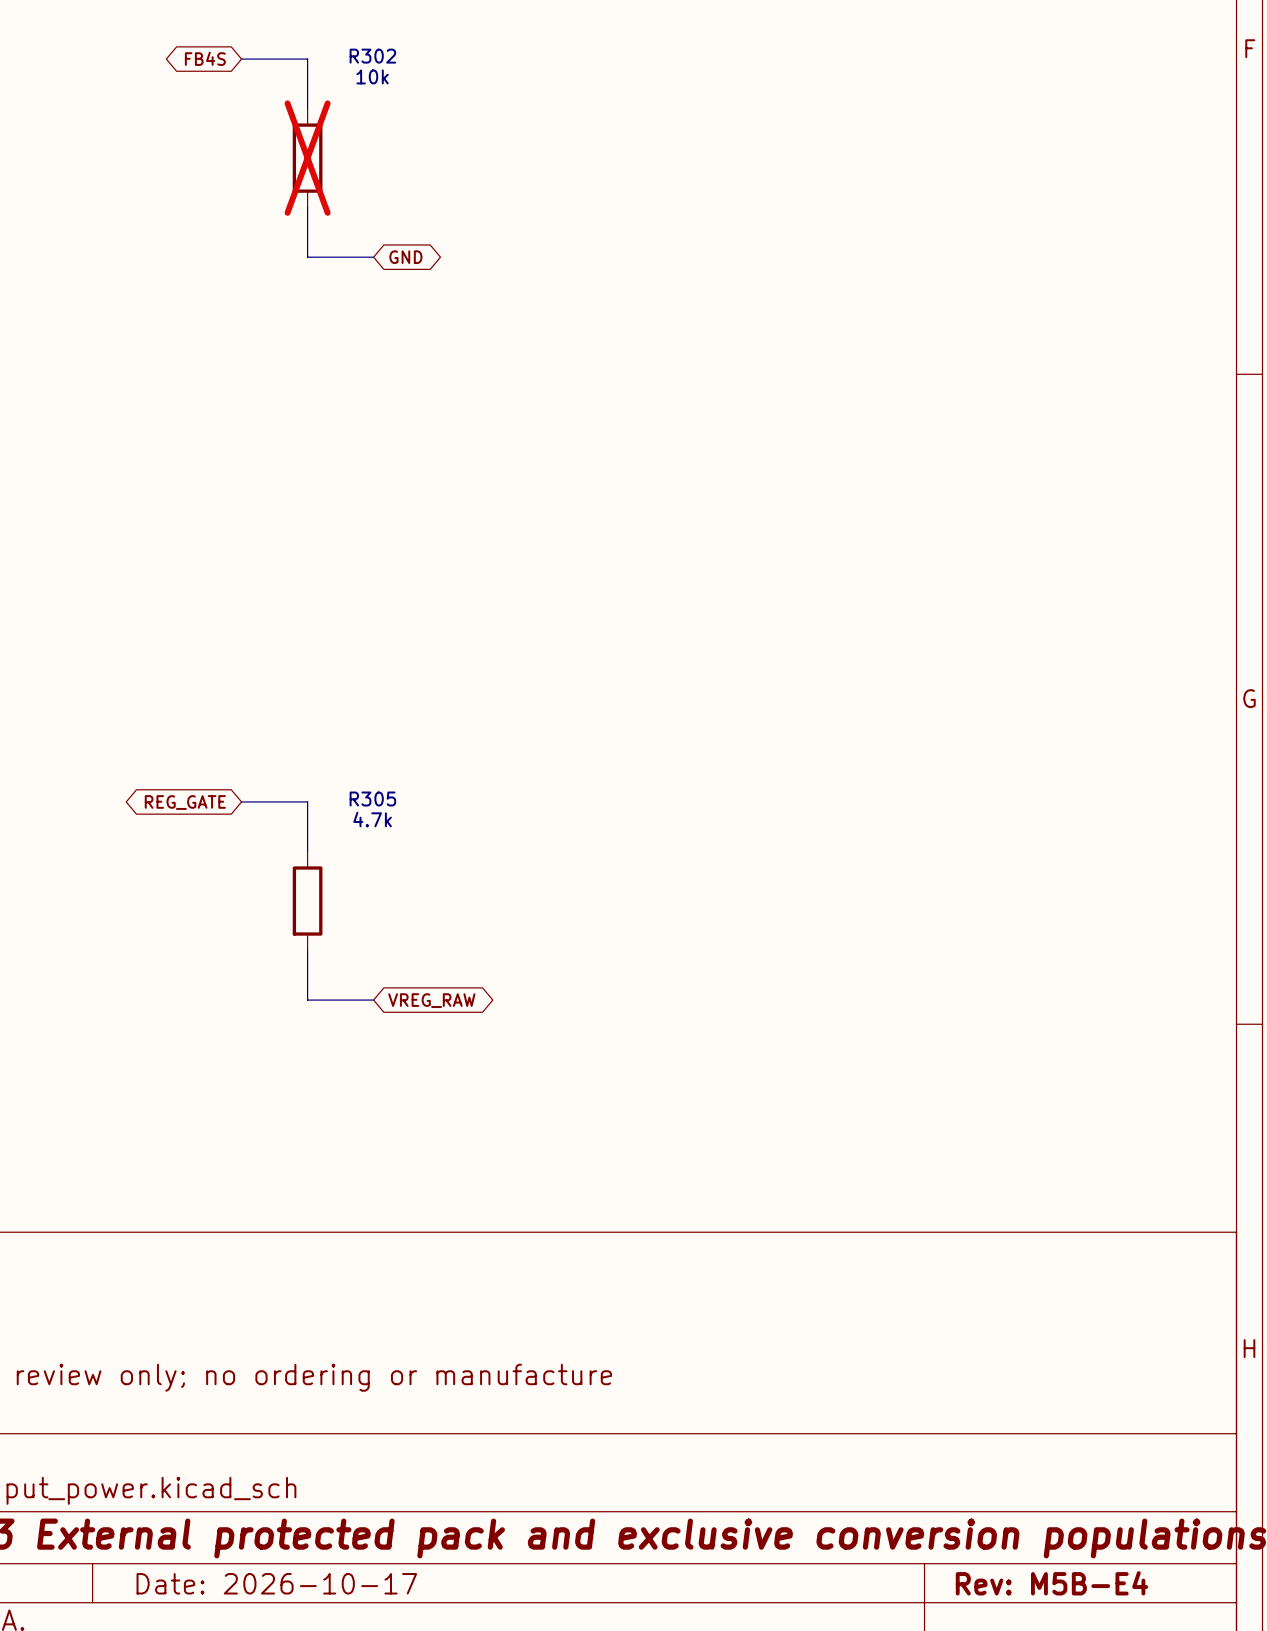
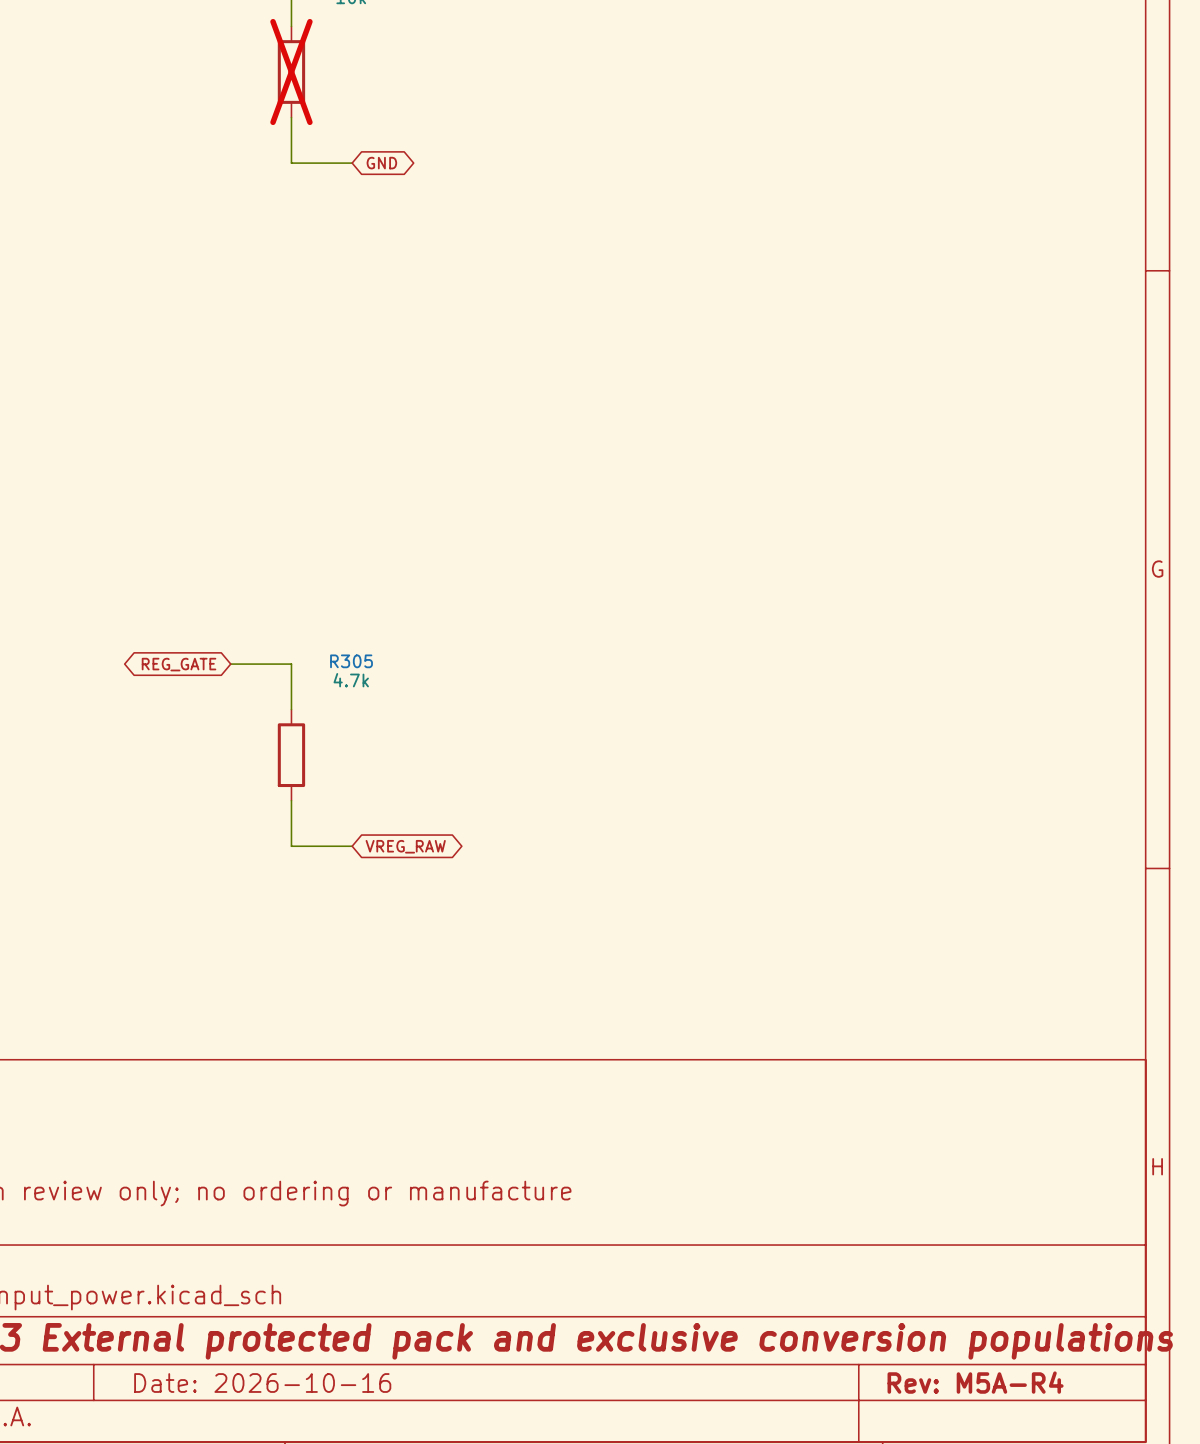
title block: Date: 2026-10-17 (276, 1583) -> Date: 2026-10-16 (262, 1383)
title block: Rev: M5B-E4 (1051, 1583) -> Rev: M5A-R4 (975, 1382)

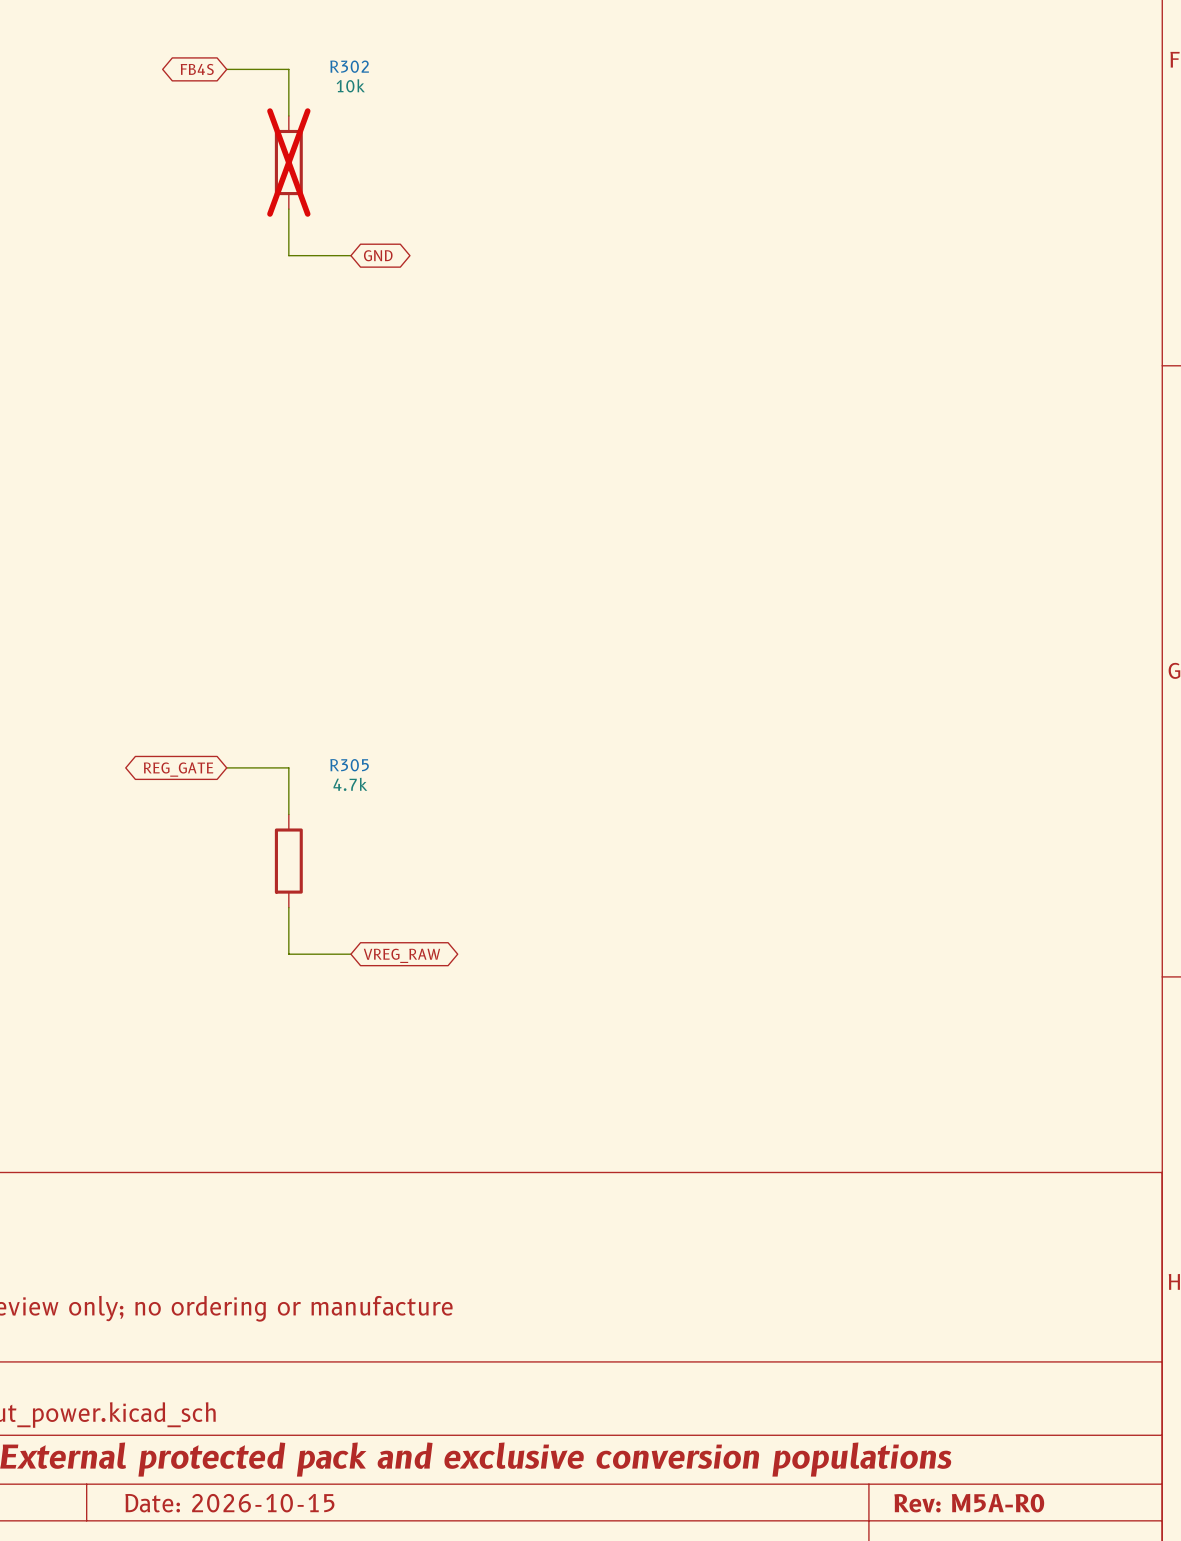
title block: Rev: M5A-R4 (975, 1382) -> Rev: M5A-R0 (969, 1503)
title block: Date: 2026-10-16 (262, 1383) -> Date: 2026-10-15 (229, 1503)

